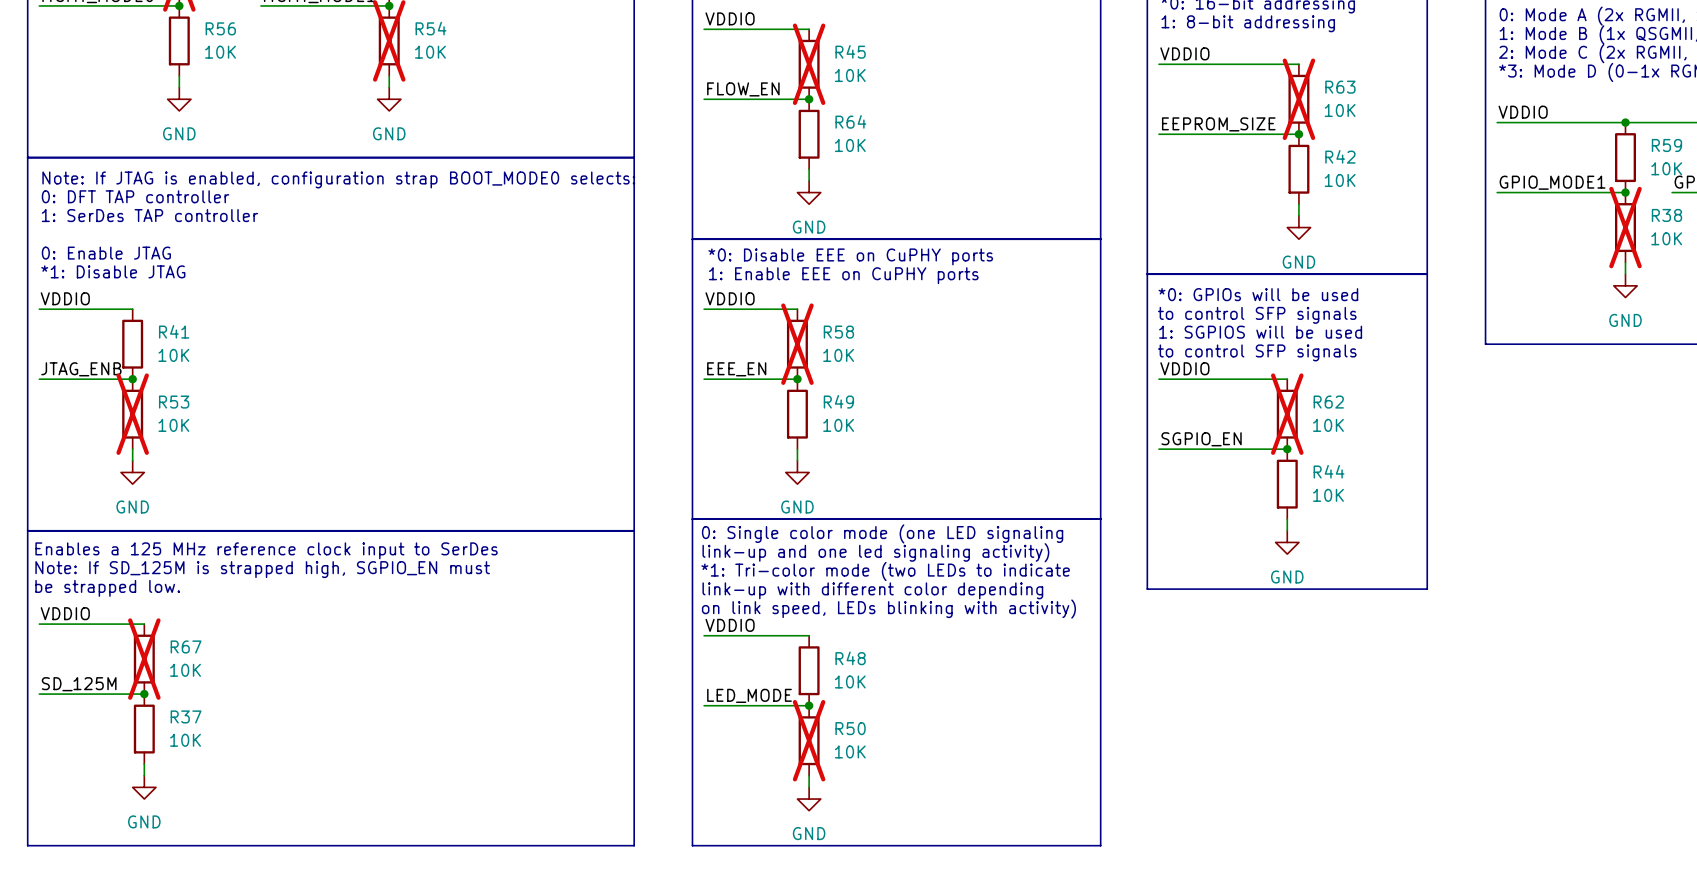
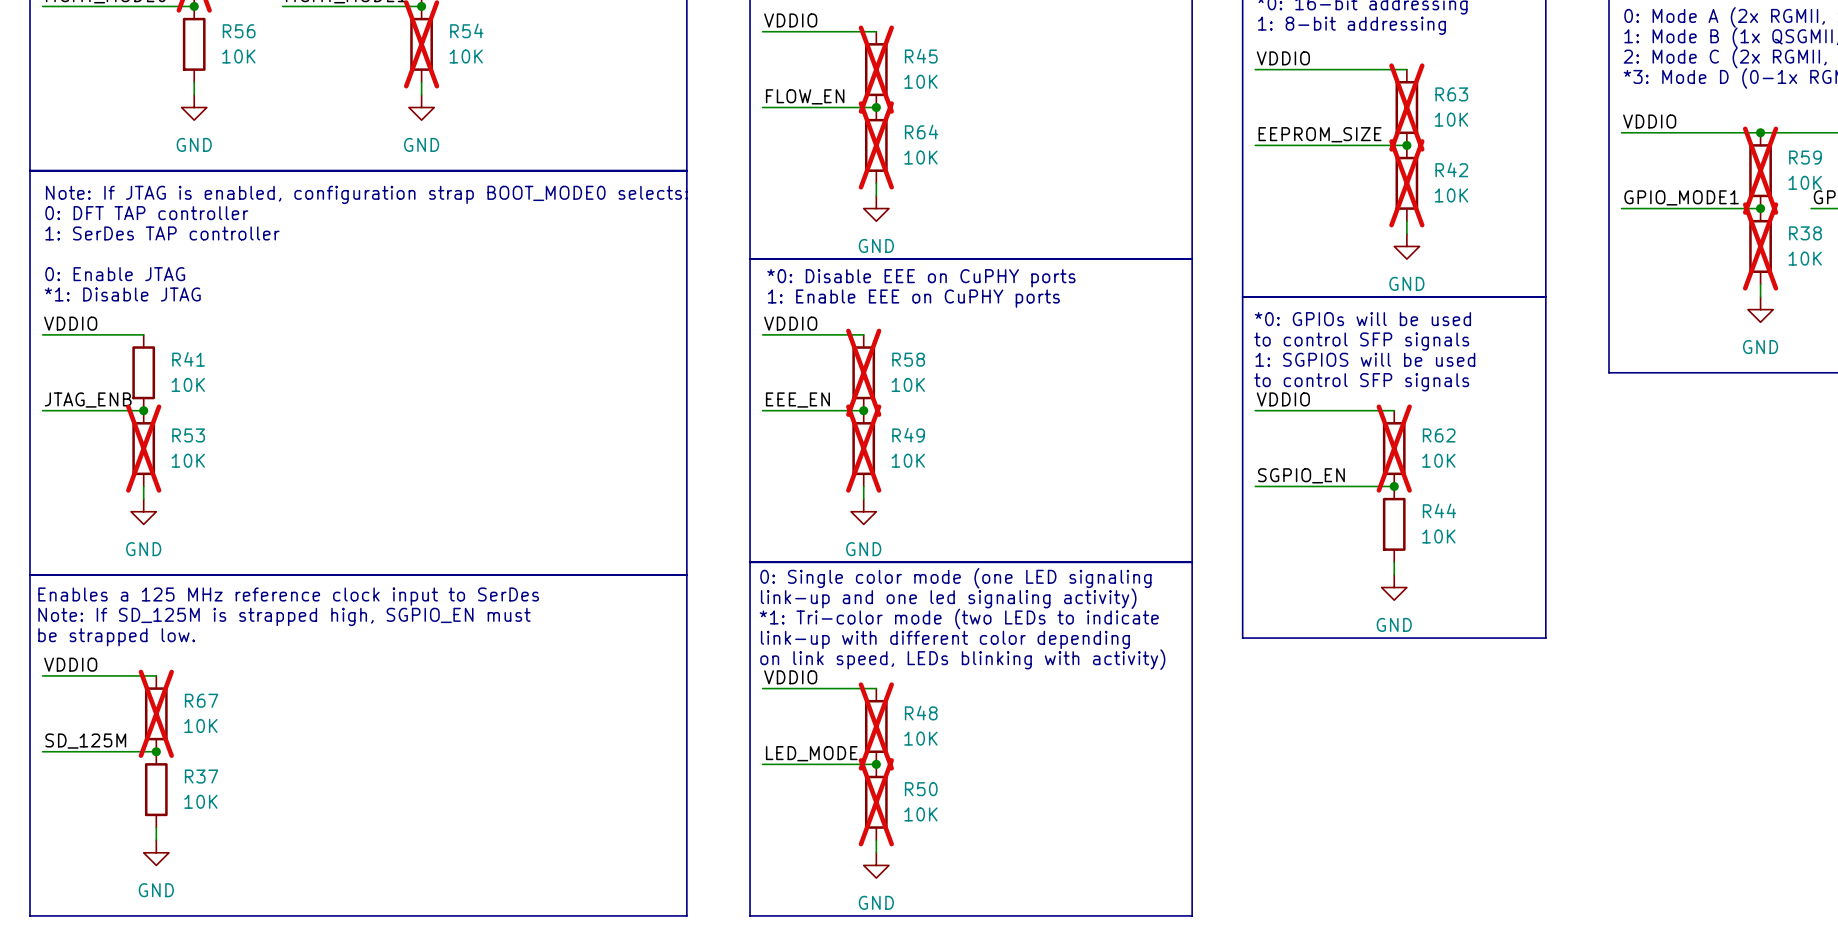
R64 do-not-place cross: none -> (876, 145)
R59 do-not-place cross: none -> (1760, 170)
R42 do-not-place cross: none -> (1406, 183)
R49 do-not-place cross: none -> (863, 448)
R48 do-not-place cross: none -> (876, 726)

